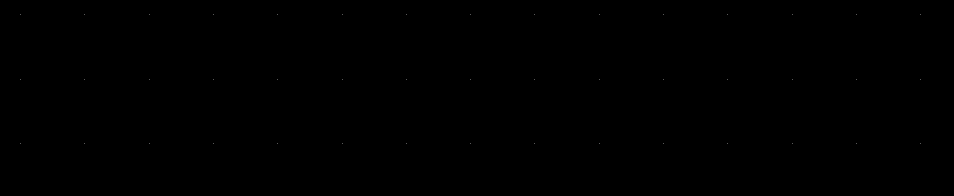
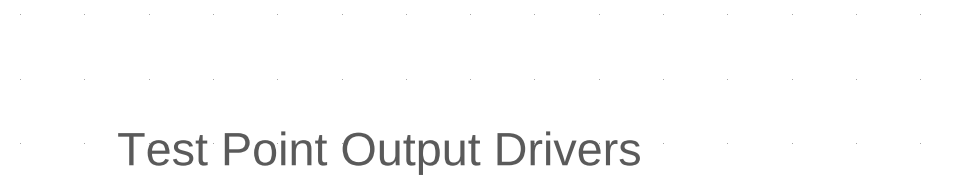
text: none -> Test Point Output Drivers (379, 153)

